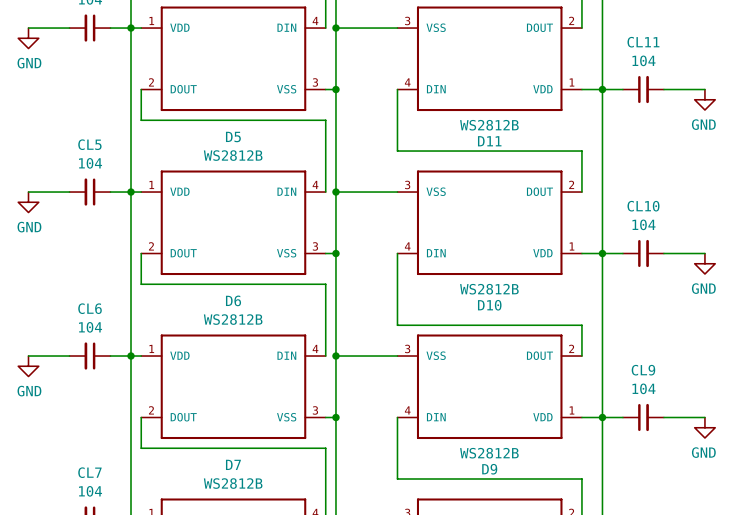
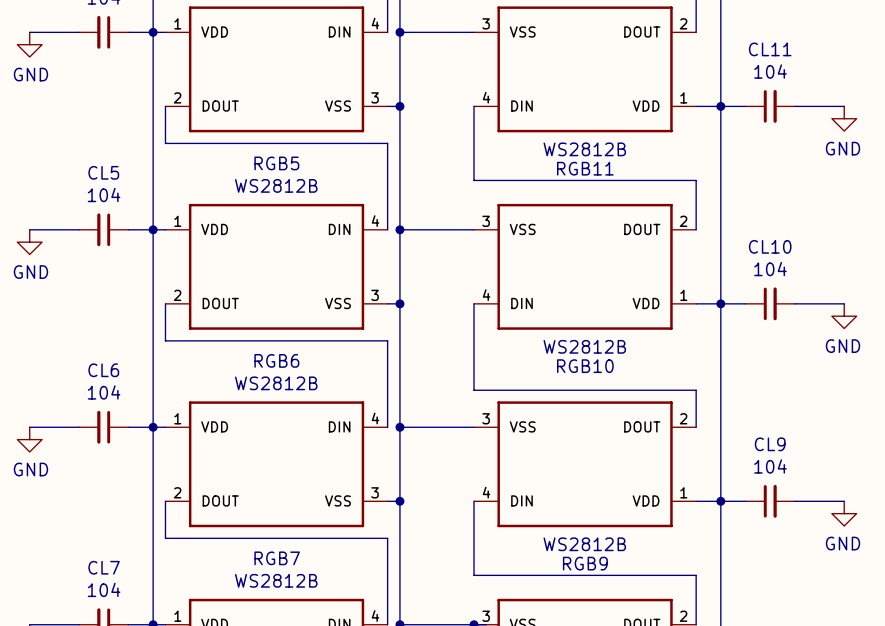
D5 name: D5 (233, 137) -> RGB5 (276, 163)
D11 name: D11 (489, 141) -> RGB11 (585, 168)
D6 name: D6 (233, 300) -> RGB6 (276, 360)
D10 name: D10 (489, 305) -> RGB10 (585, 366)
D7 name: D7 (233, 464) -> RGB7 (277, 558)
D9 name: D9 (489, 469) -> RGB9 (585, 563)

